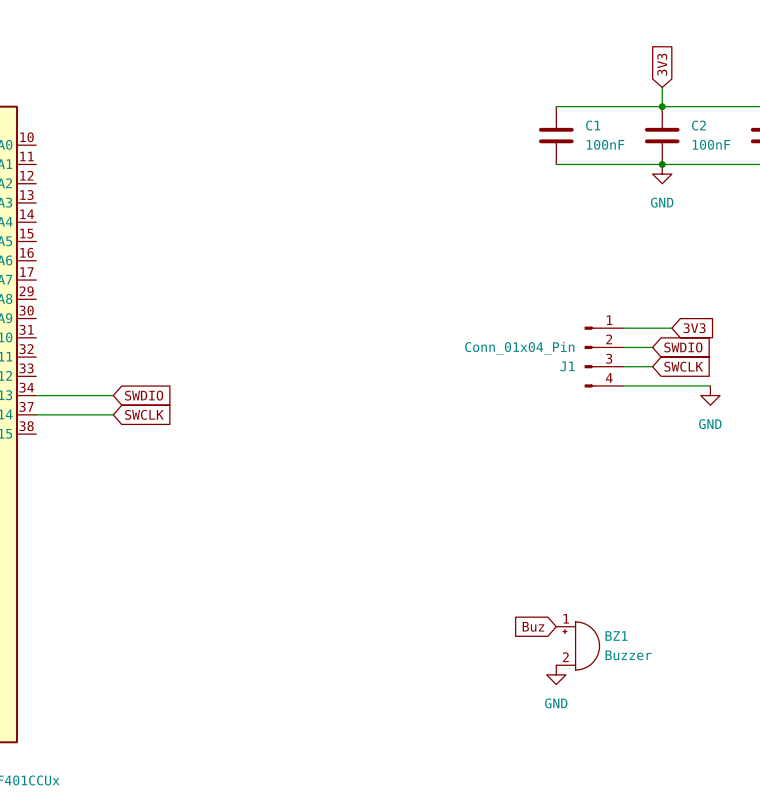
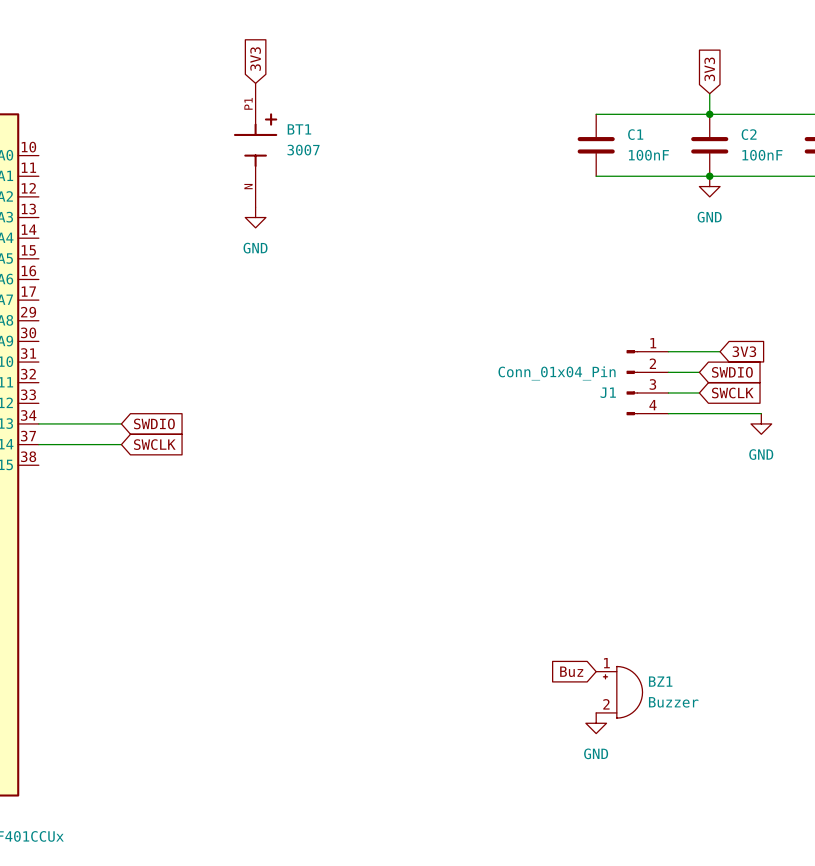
global label: none -> 3V3 (255, 59)
BT1: none -> 3007 (255, 145)
power symbol: none -> GND (255, 217)

